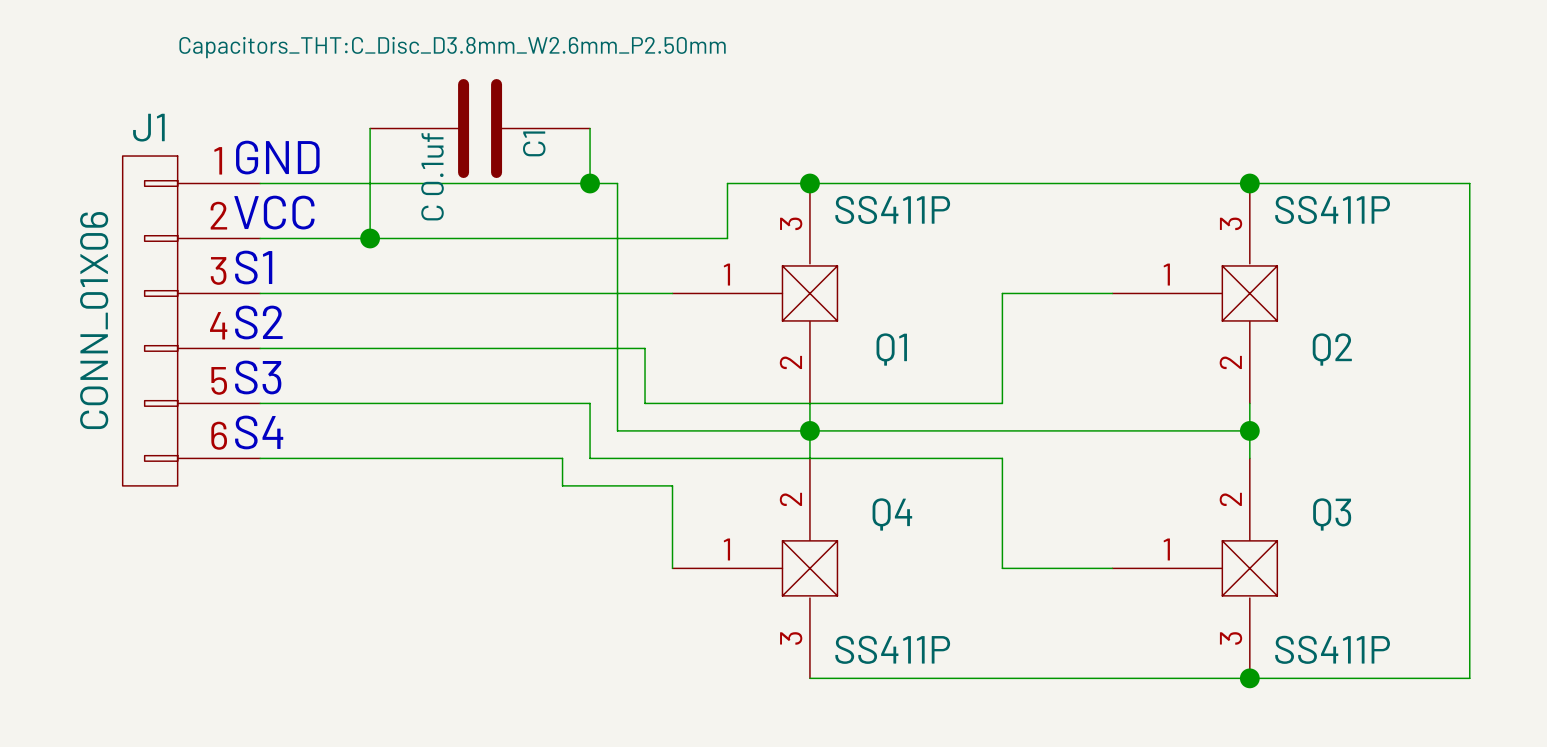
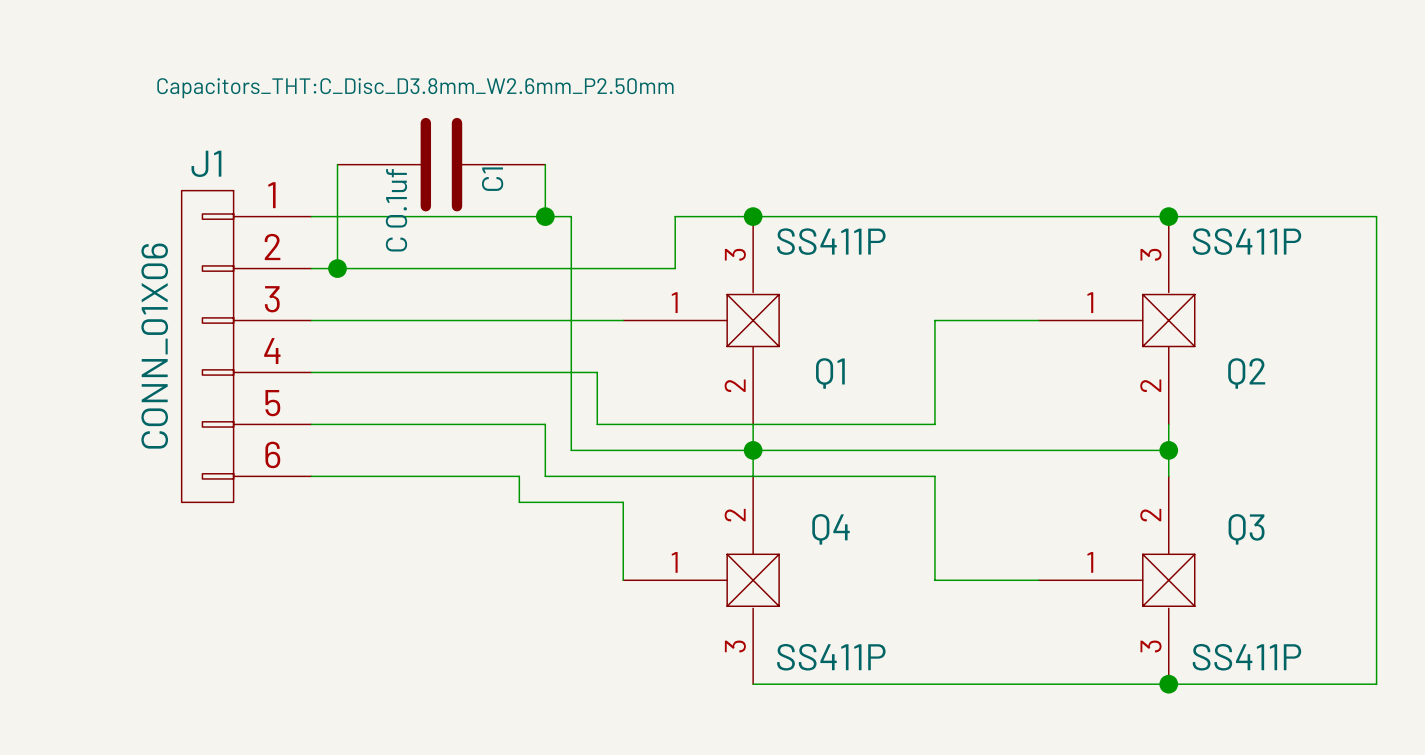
text: GND (277, 157) -> none
text: VCC (274, 212) -> none
text: S1 (253, 267) -> none
J1 position: (191, 320) -> (246, 346)
text: S2 (258, 322) -> none
text: S3 (258, 377) -> none
text: S4 (259, 432) -> none

